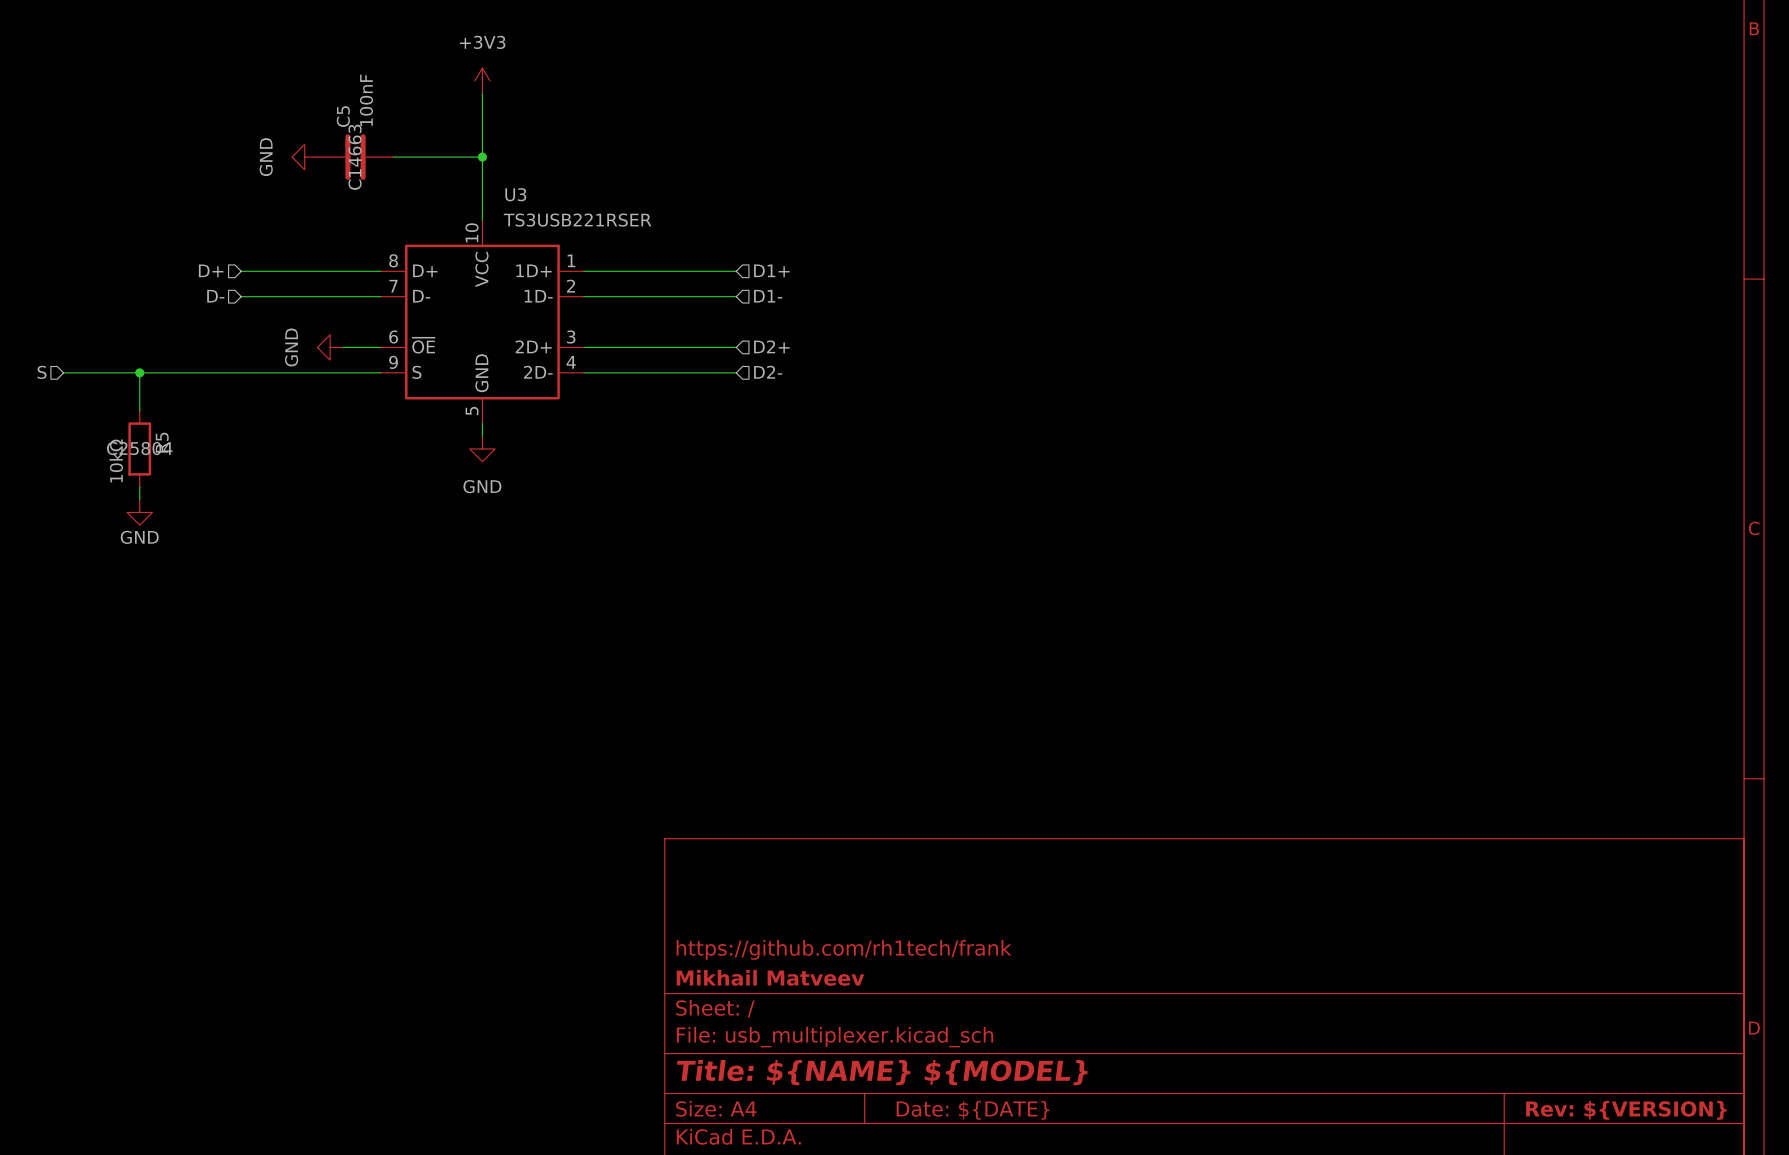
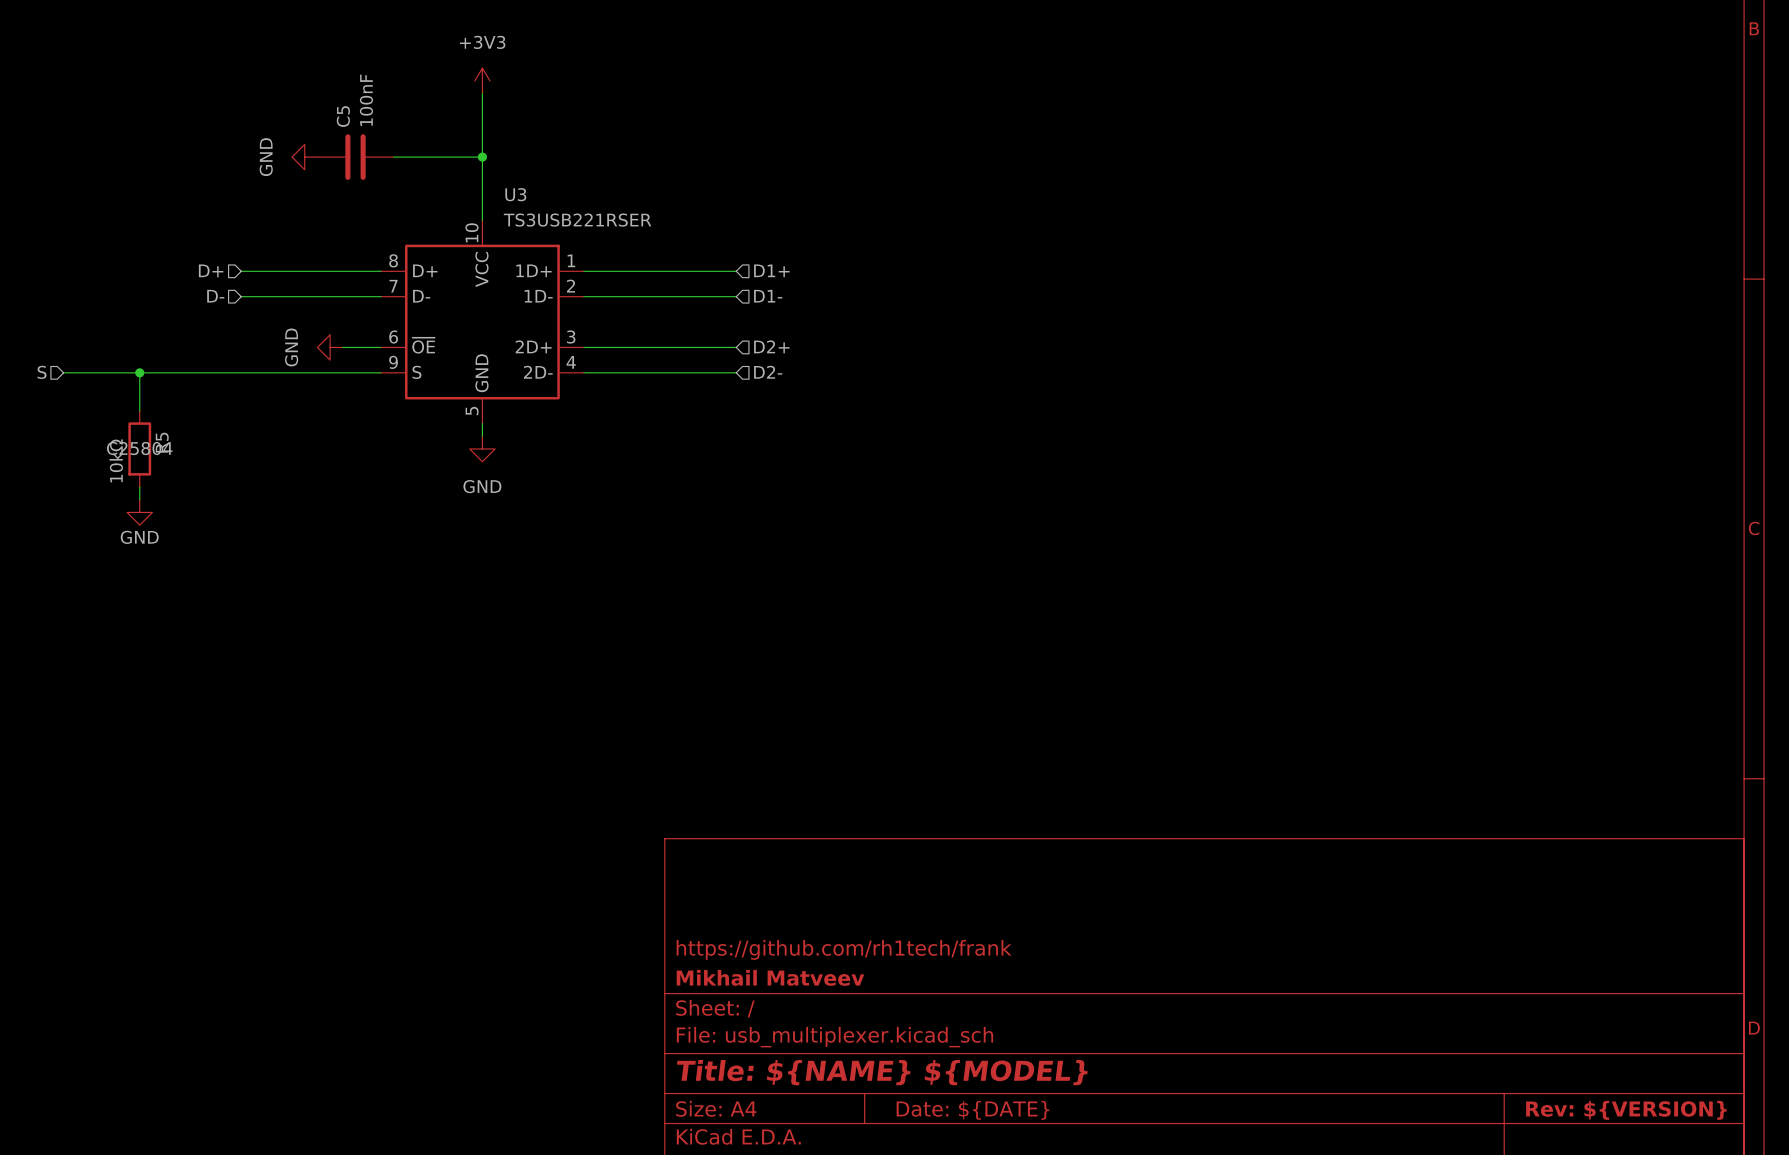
C5 text: C14663 (355, 157) -> none

